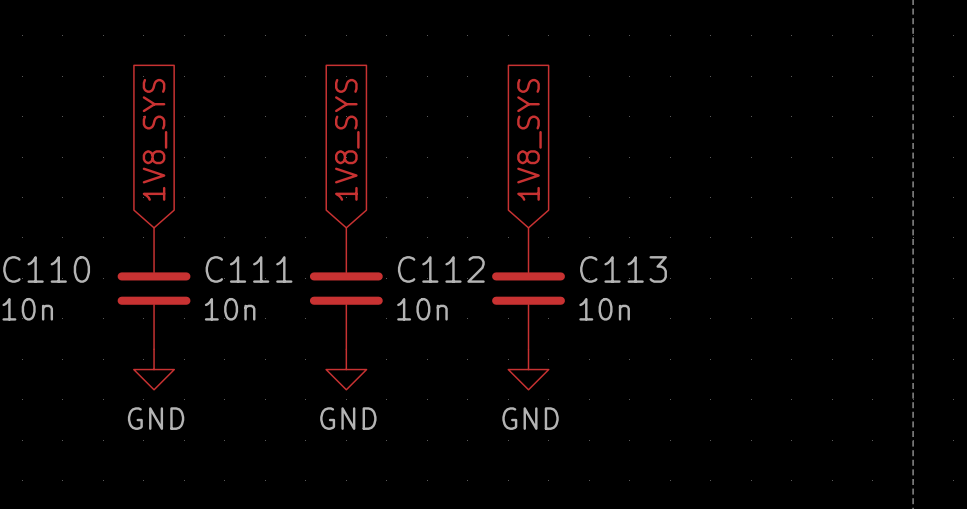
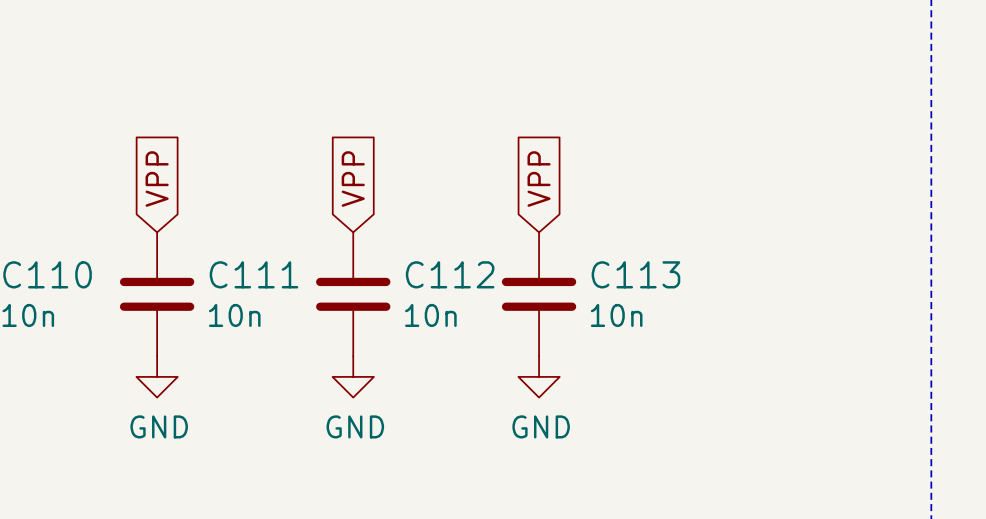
global label: 1V8_SYS (155, 139) -> VPP (157, 179)
global label: 1V8_SYS (347, 139) -> VPP (353, 179)
global label: 1V8_SYS (529, 139) -> VPP (539, 179)

